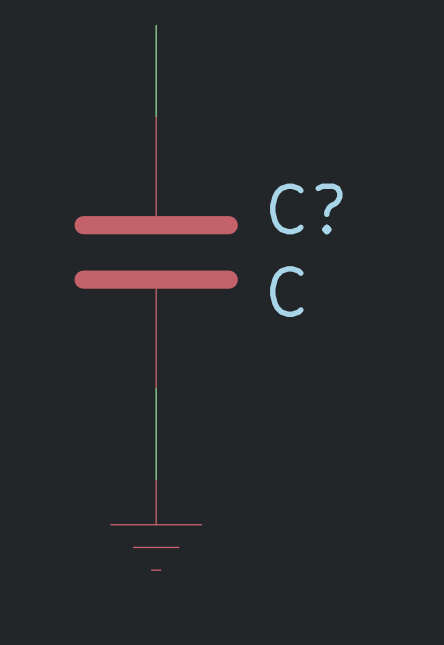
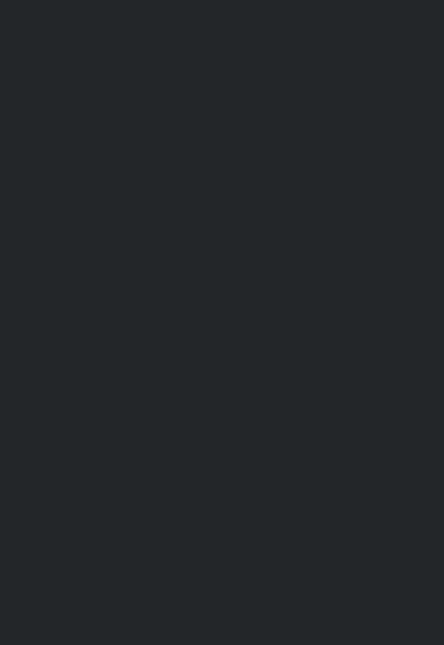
wire: (156, 25) (156, 116) -> none
C?: C (156, 252) -> none
wire: (156, 388) (156, 479) -> none
power symbol: (156, 524) -> none

